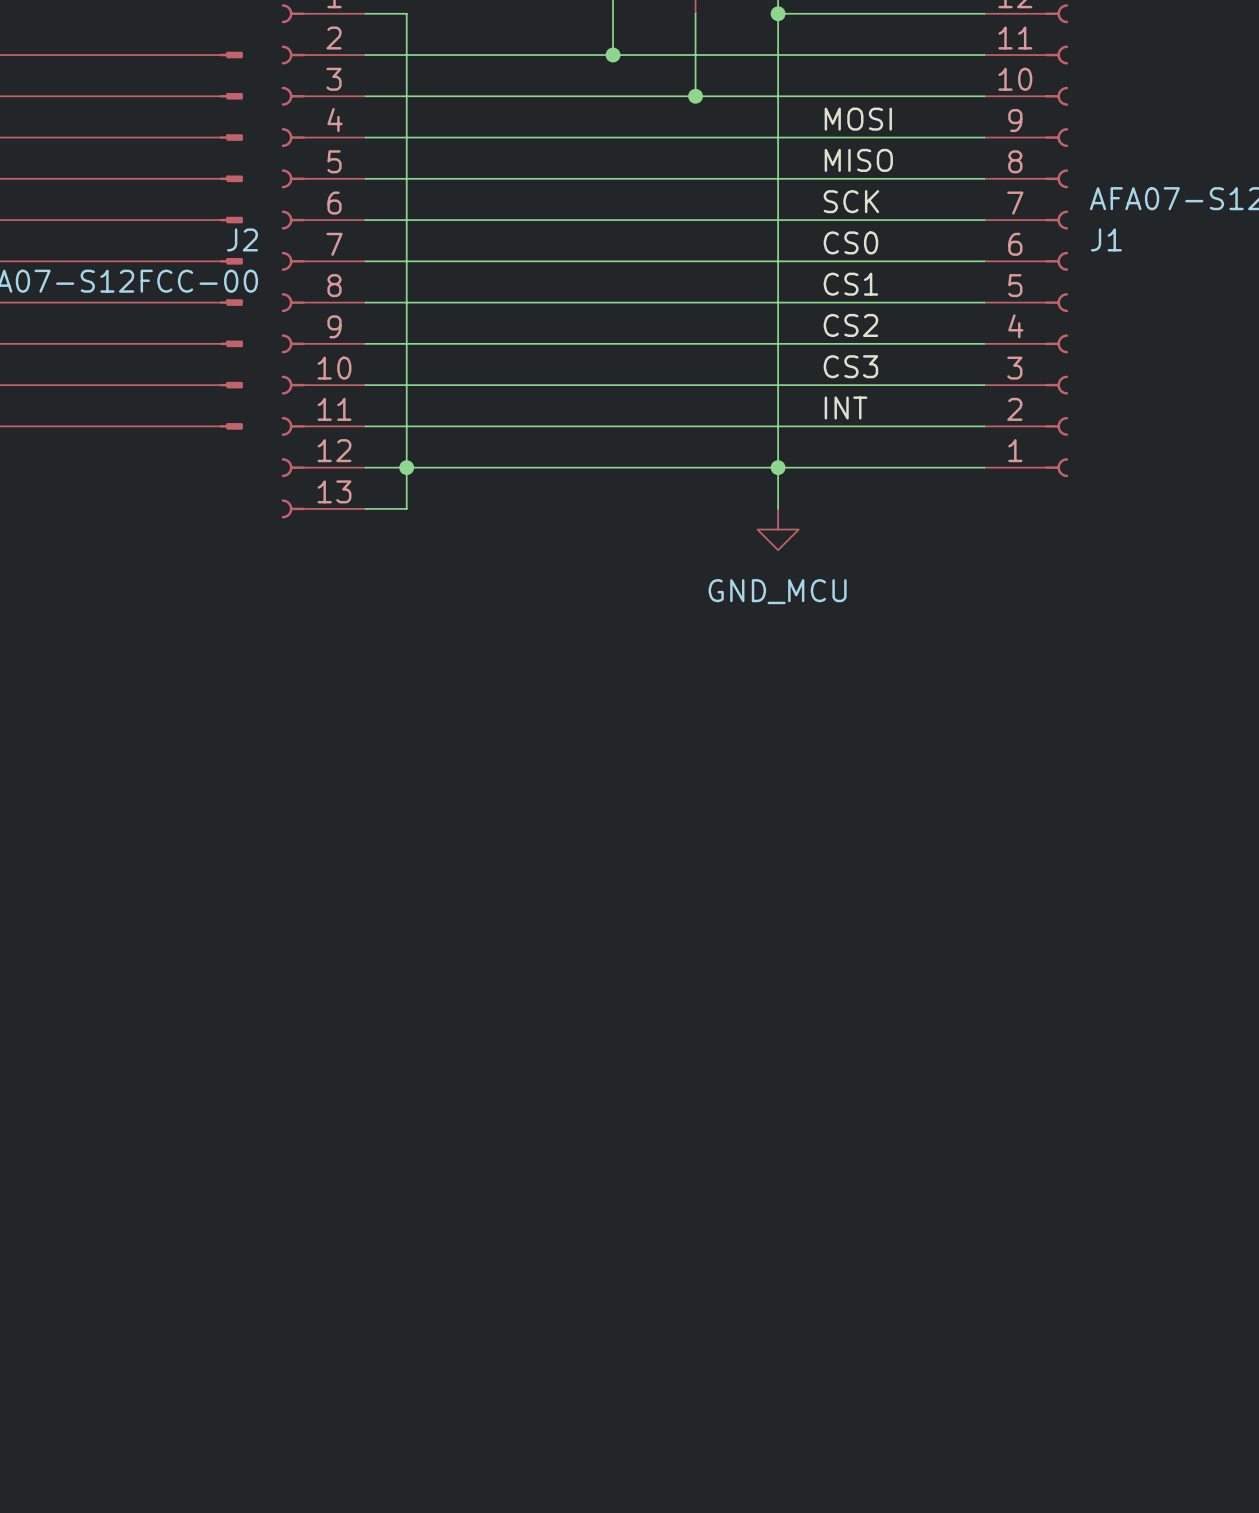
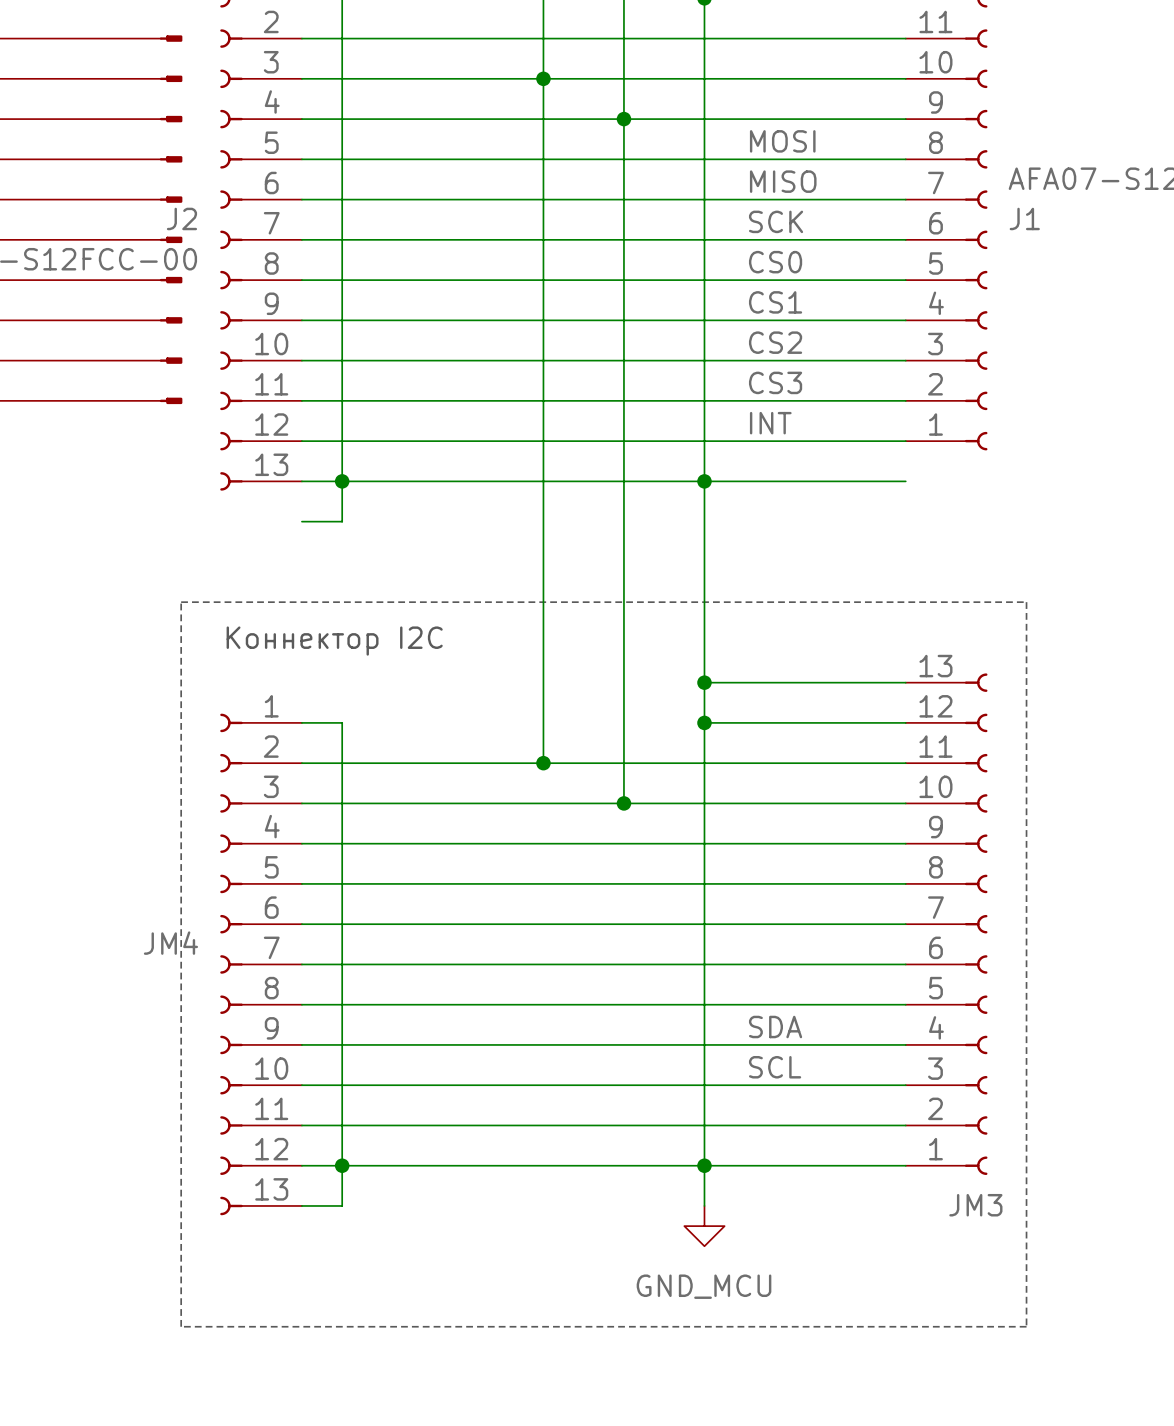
wire: none -> (543, 38) (543, 763)
junction: (613, 55) -> none
junction: none -> (543, 78)
wire: none -> (623, 78) (623, 803)
junction: (695, 96) -> none
label: MOSI (858, 119) -> none
junction: none -> (623, 119)
label: MISO (858, 160) -> MOSI (782, 141)
label: SCK (851, 201) -> MISO (783, 181)
label: CS0 (850, 242) -> SCK (776, 221)
label: CS1 (850, 284) -> CS0 (775, 262)
label: CS2 (850, 325) -> CS1 (775, 302)
label: CS3 (850, 366) -> CS2 (775, 342)
label: INT (846, 407) -> CS3 (775, 382)
label: none -> INT (770, 423)
junction position: (406, 467) -> (342, 481)
junction position: (778, 467) -> (704, 481)
wire: none -> (704, 481) (704, 1205)
wire: none -> (905, 481) (342, 481) (342, 521) (301, 521)
power symbol: GND_MCU (778, 529) -> none
line: none -> (181, 602) (181, 1326) (1026, 1326) (1026, 602) (181, 602)
text: none -> Коннектор I2C (334, 641)
wire: none -> (704, 682) (905, 682)
junction: none -> (704, 682)
wire: none -> (301, 722) (342, 722) (342, 1205) (301, 1205)
wire: none -> (704, 722) (905, 722)
junction: none -> (704, 722)
wire: none -> (301, 763) (905, 763)
junction: none -> (543, 763)
wire: none -> (301, 803) (905, 803)
junction: none -> (623, 803)
wire: none -> (301, 843) (905, 843)
wire: none -> (301, 883) (905, 883)
wire: none -> (301, 924) (905, 924)
JM3: none -> (946, 924)
JM4: none -> (261, 964)
wire: none -> (301, 964) (905, 964)
wire: none -> (301, 1004) (905, 1004)
label: none -> SDA (775, 1027)
wire: none -> (301, 1044) (905, 1044)
label: none -> SCL (775, 1067)
wire: none -> (301, 1085) (905, 1085)
wire: none -> (301, 1125) (905, 1125)
wire: none -> (301, 1165) (905, 1165)
junction: none -> (342, 1165)
junction: none -> (704, 1165)
power symbol: none -> GND_MCU (704, 1226)

